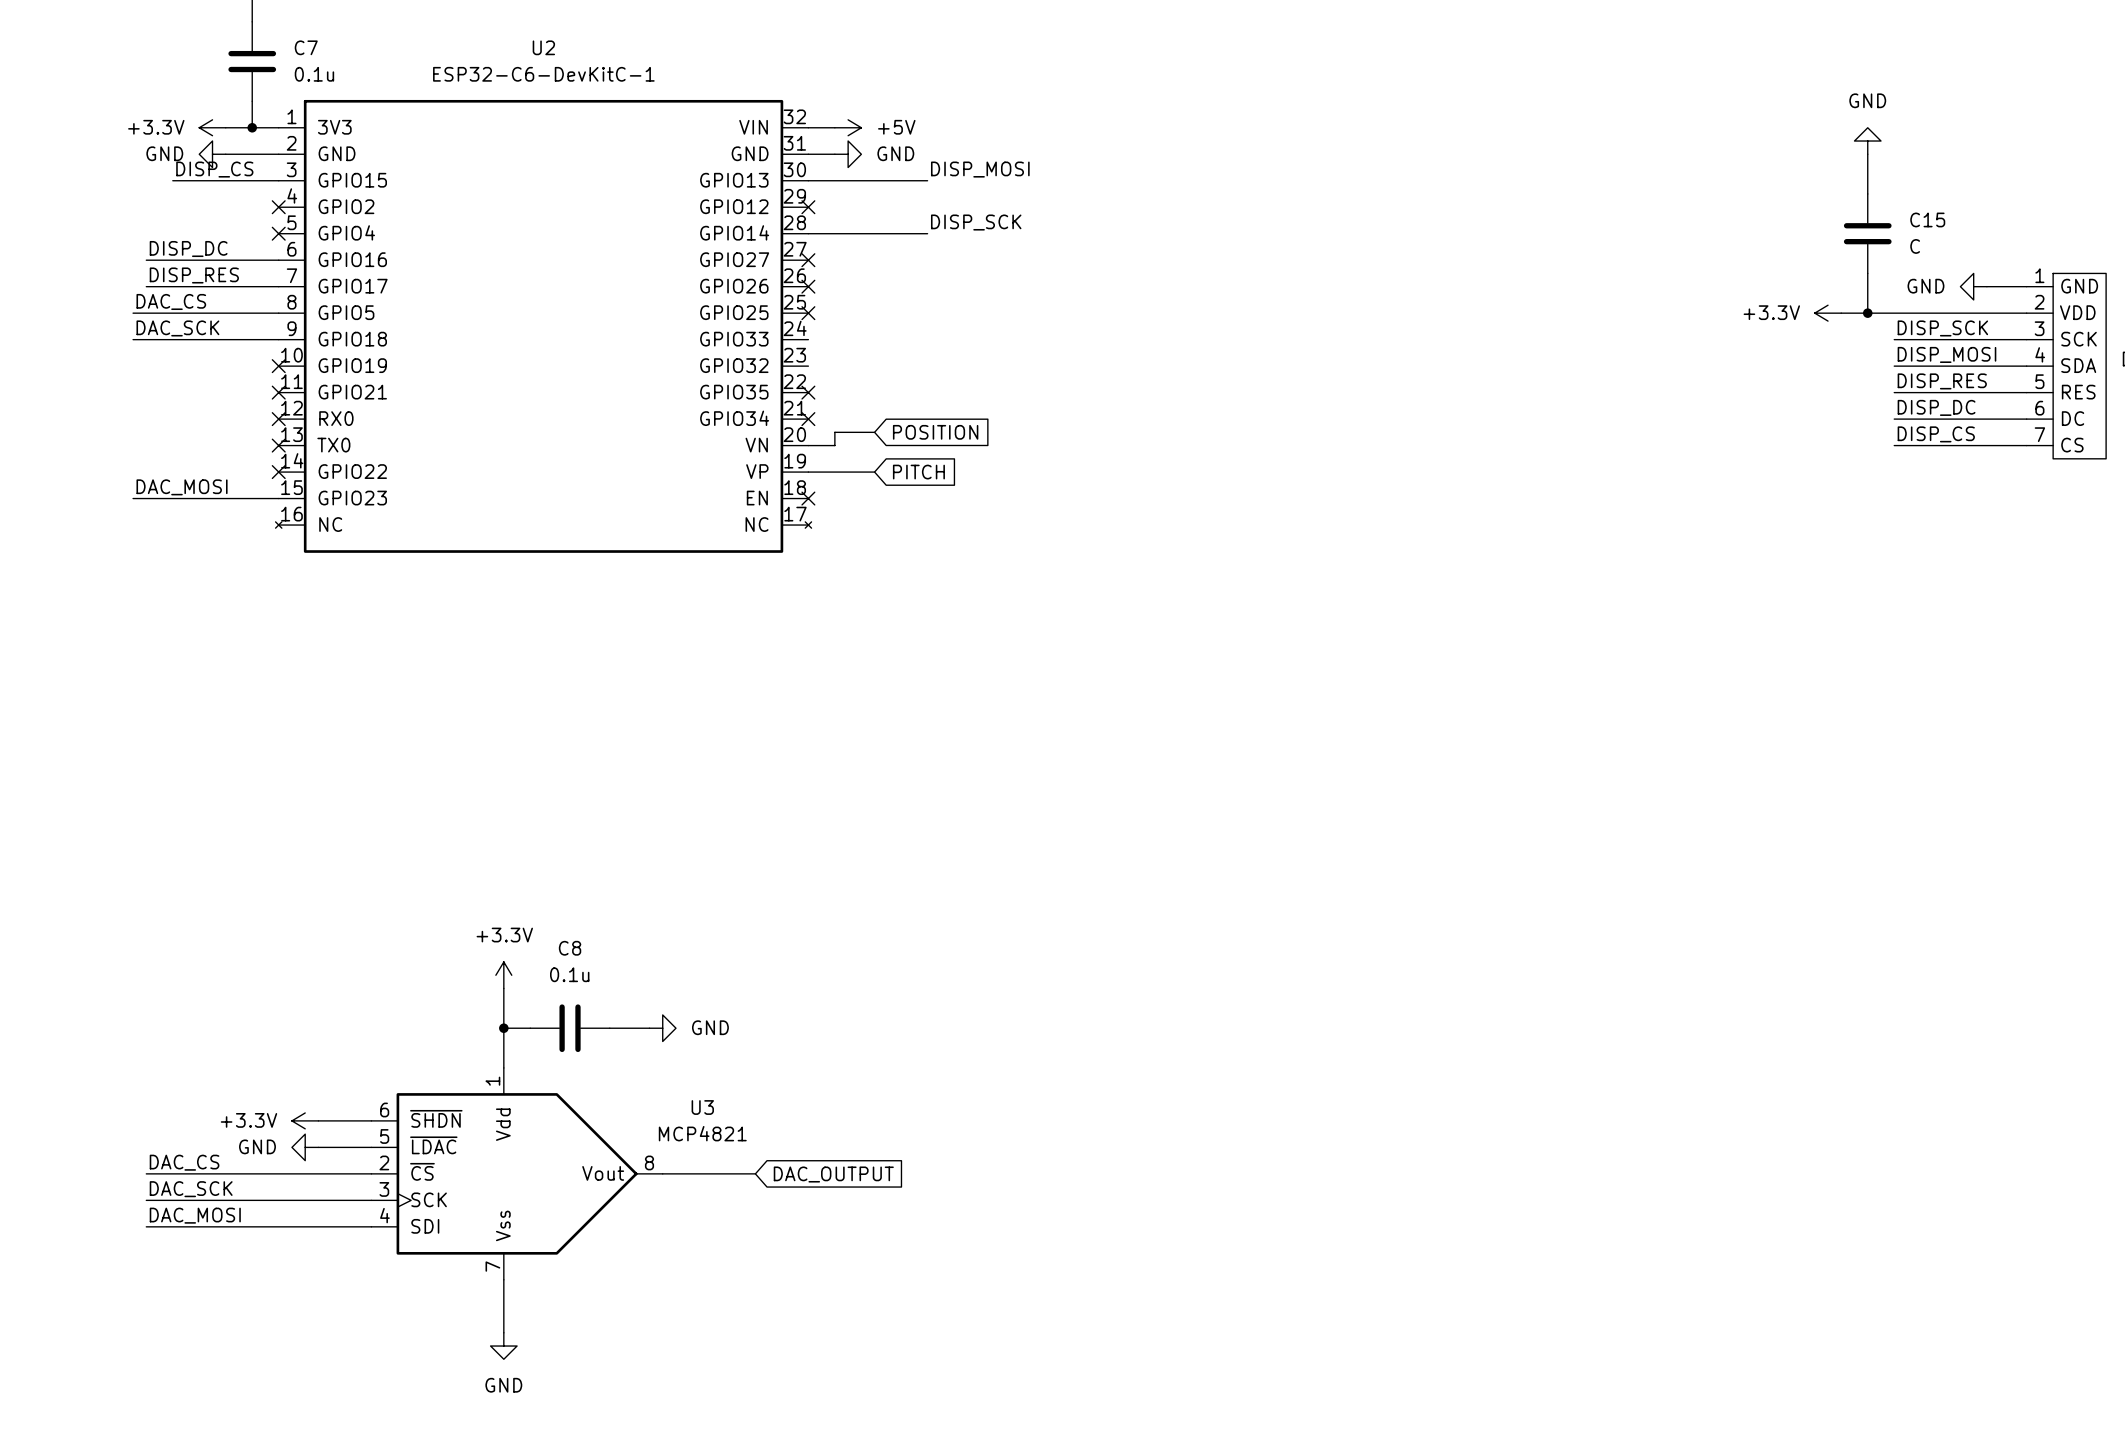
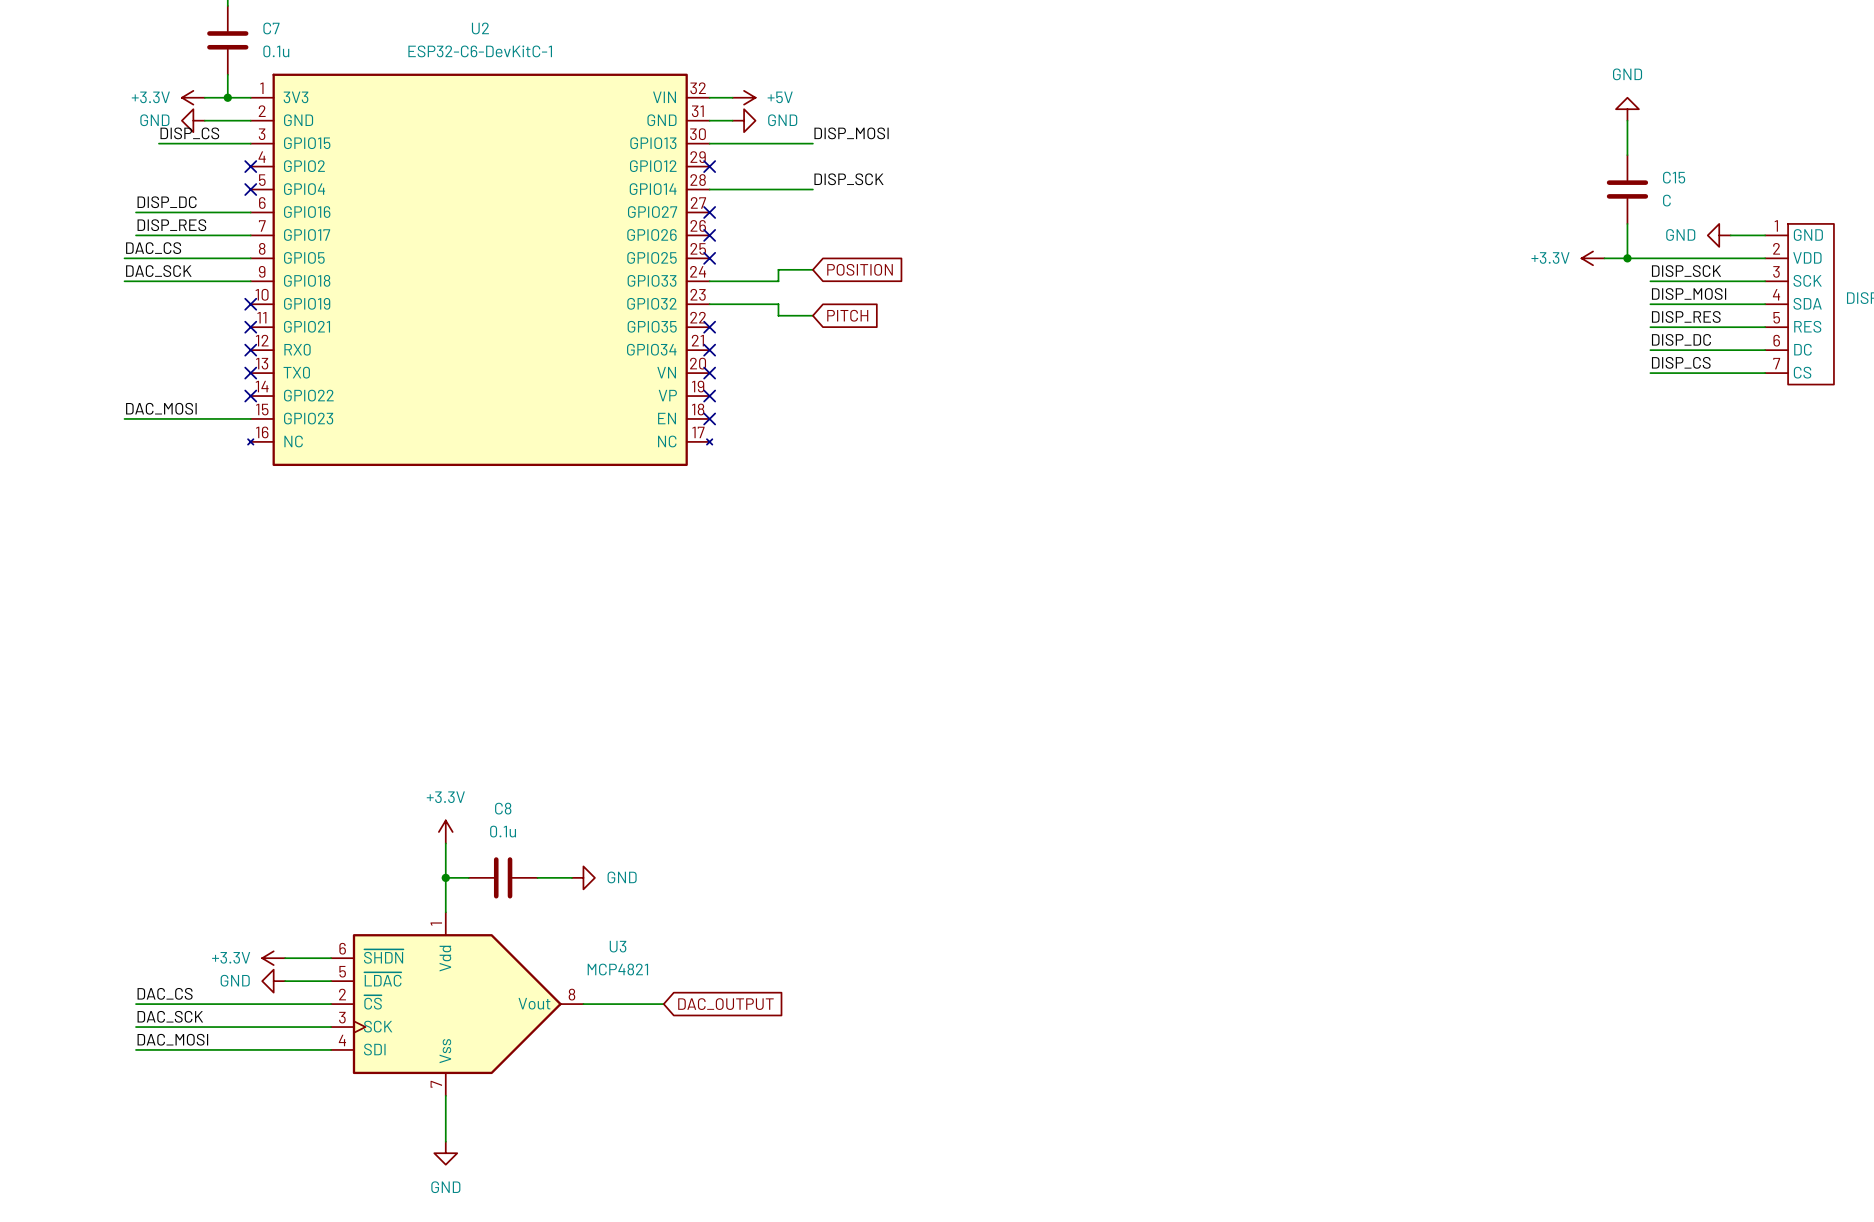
wire: none -> (812, 269) (778, 269) (778, 281) (709, 281)
wire: none -> (709, 304) (778, 304) (778, 315) (812, 315)
wire: (874, 432) (834, 432) (834, 445) (808, 445) -> none
global label position: POSITION (935, 432) -> POSITION (860, 269)
no-connect mark: none -> (709, 373)
wire: (808, 472) (874, 472) -> none
no-connect mark: none -> (709, 396)
global label position: PITCH (918, 472) -> PITCH (847, 315)

